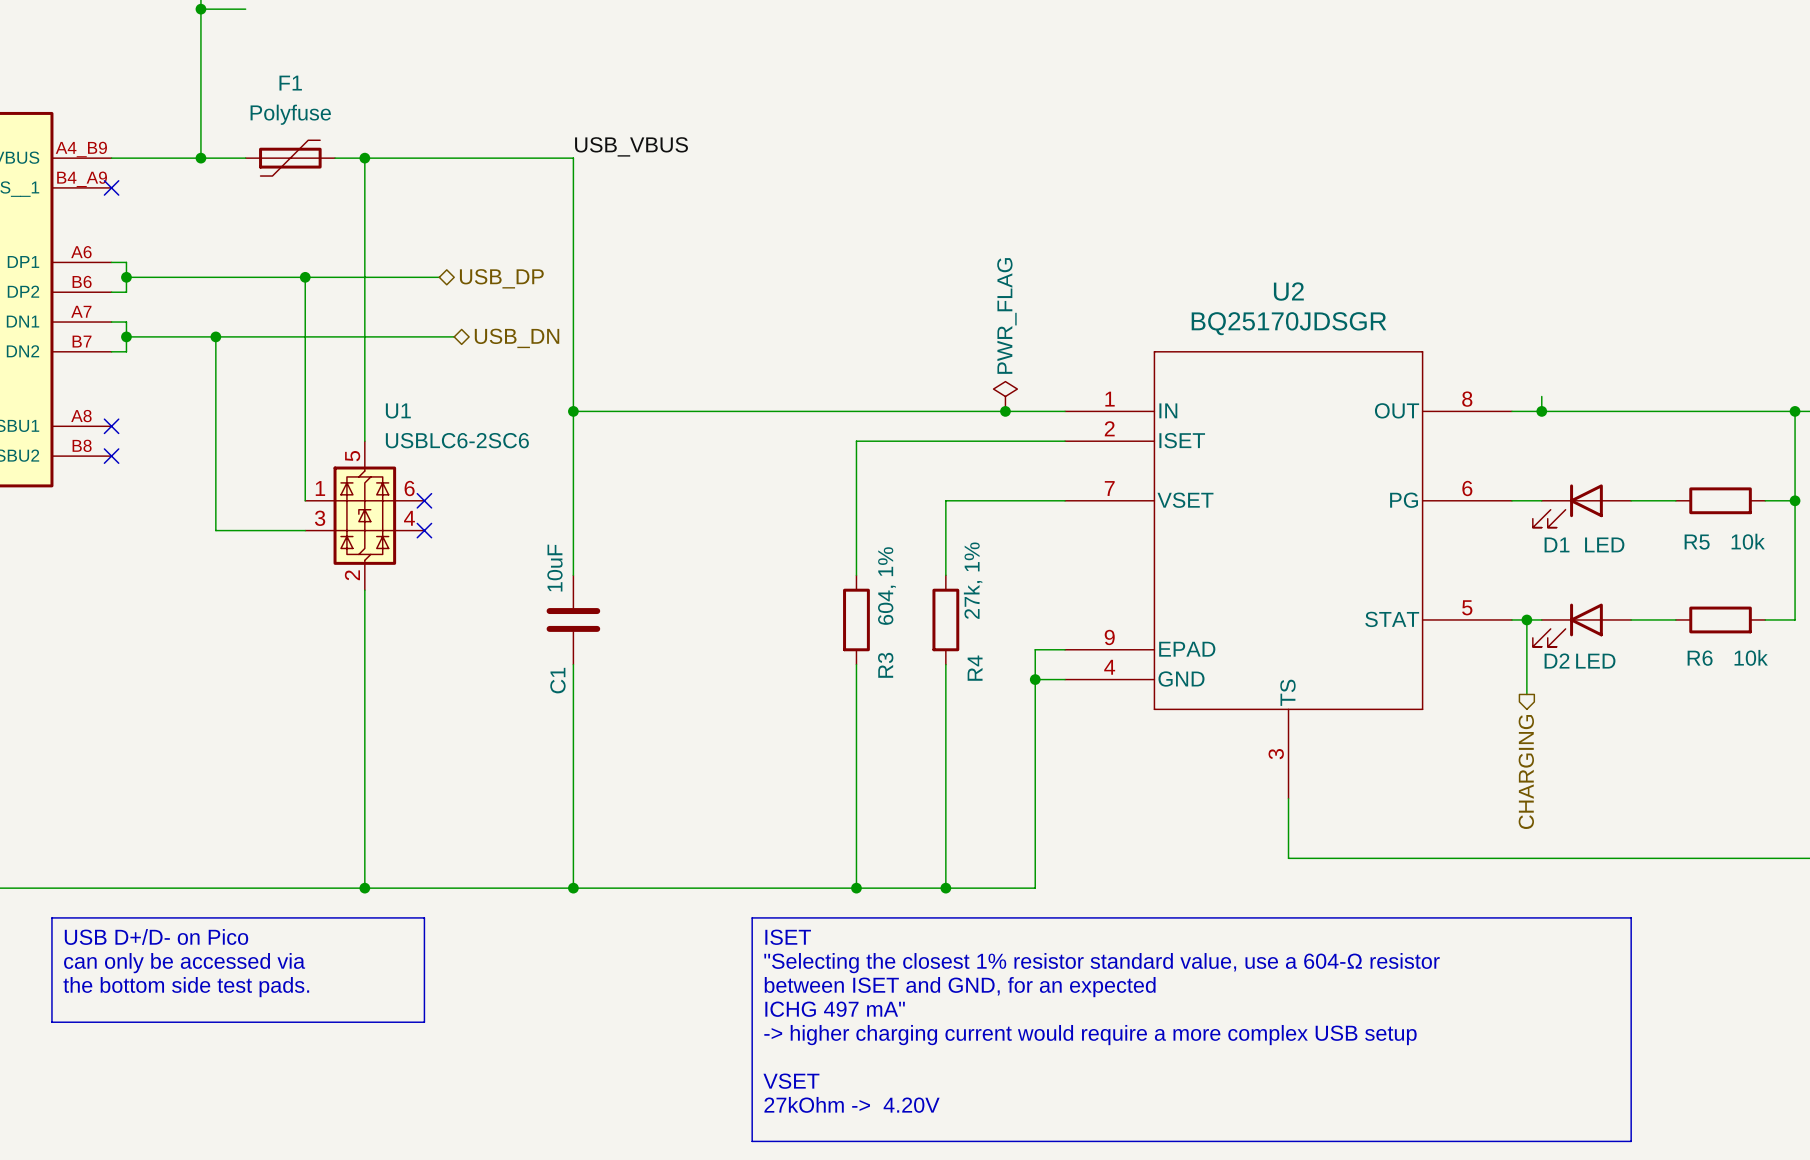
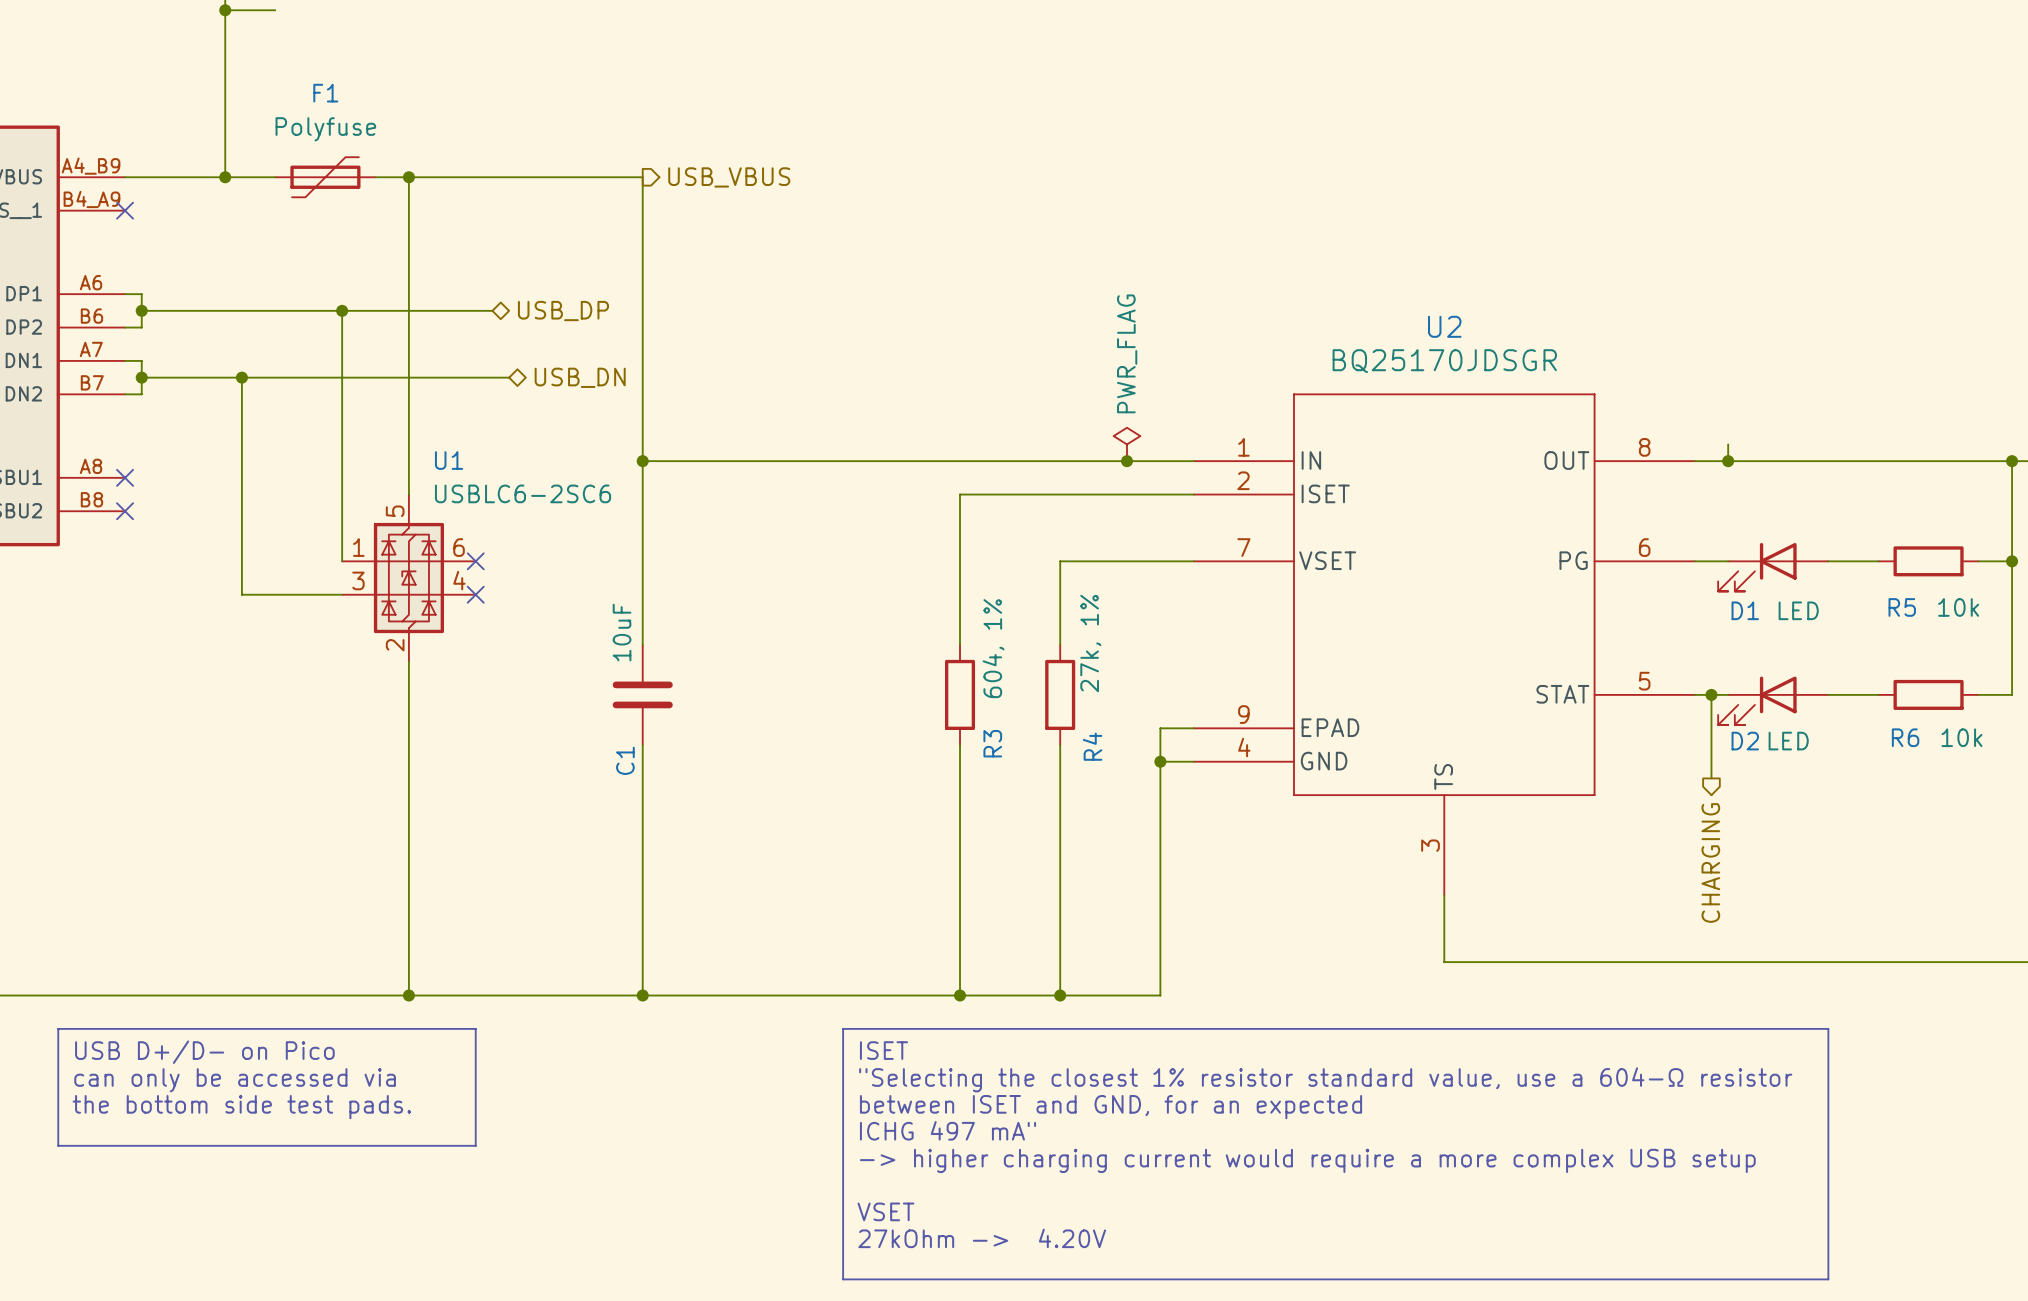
label: USB_VBUS (631, 146) -> none
hierarchical label: none -> USB_VBUS (729, 177)

